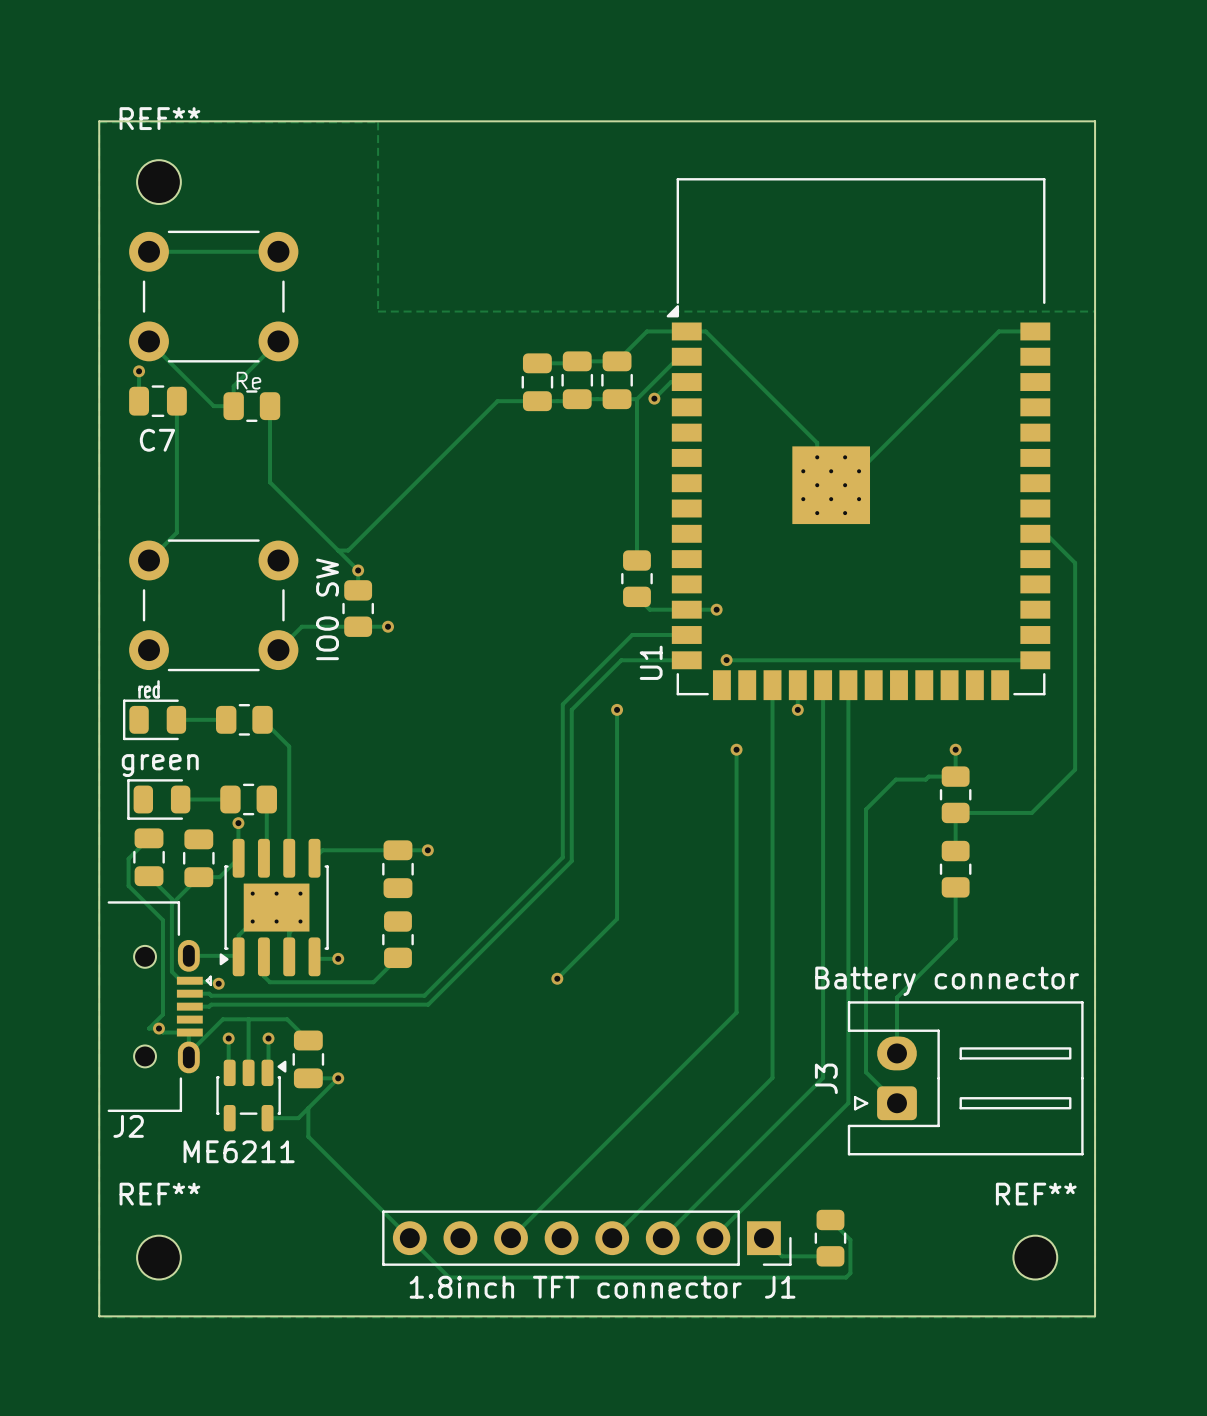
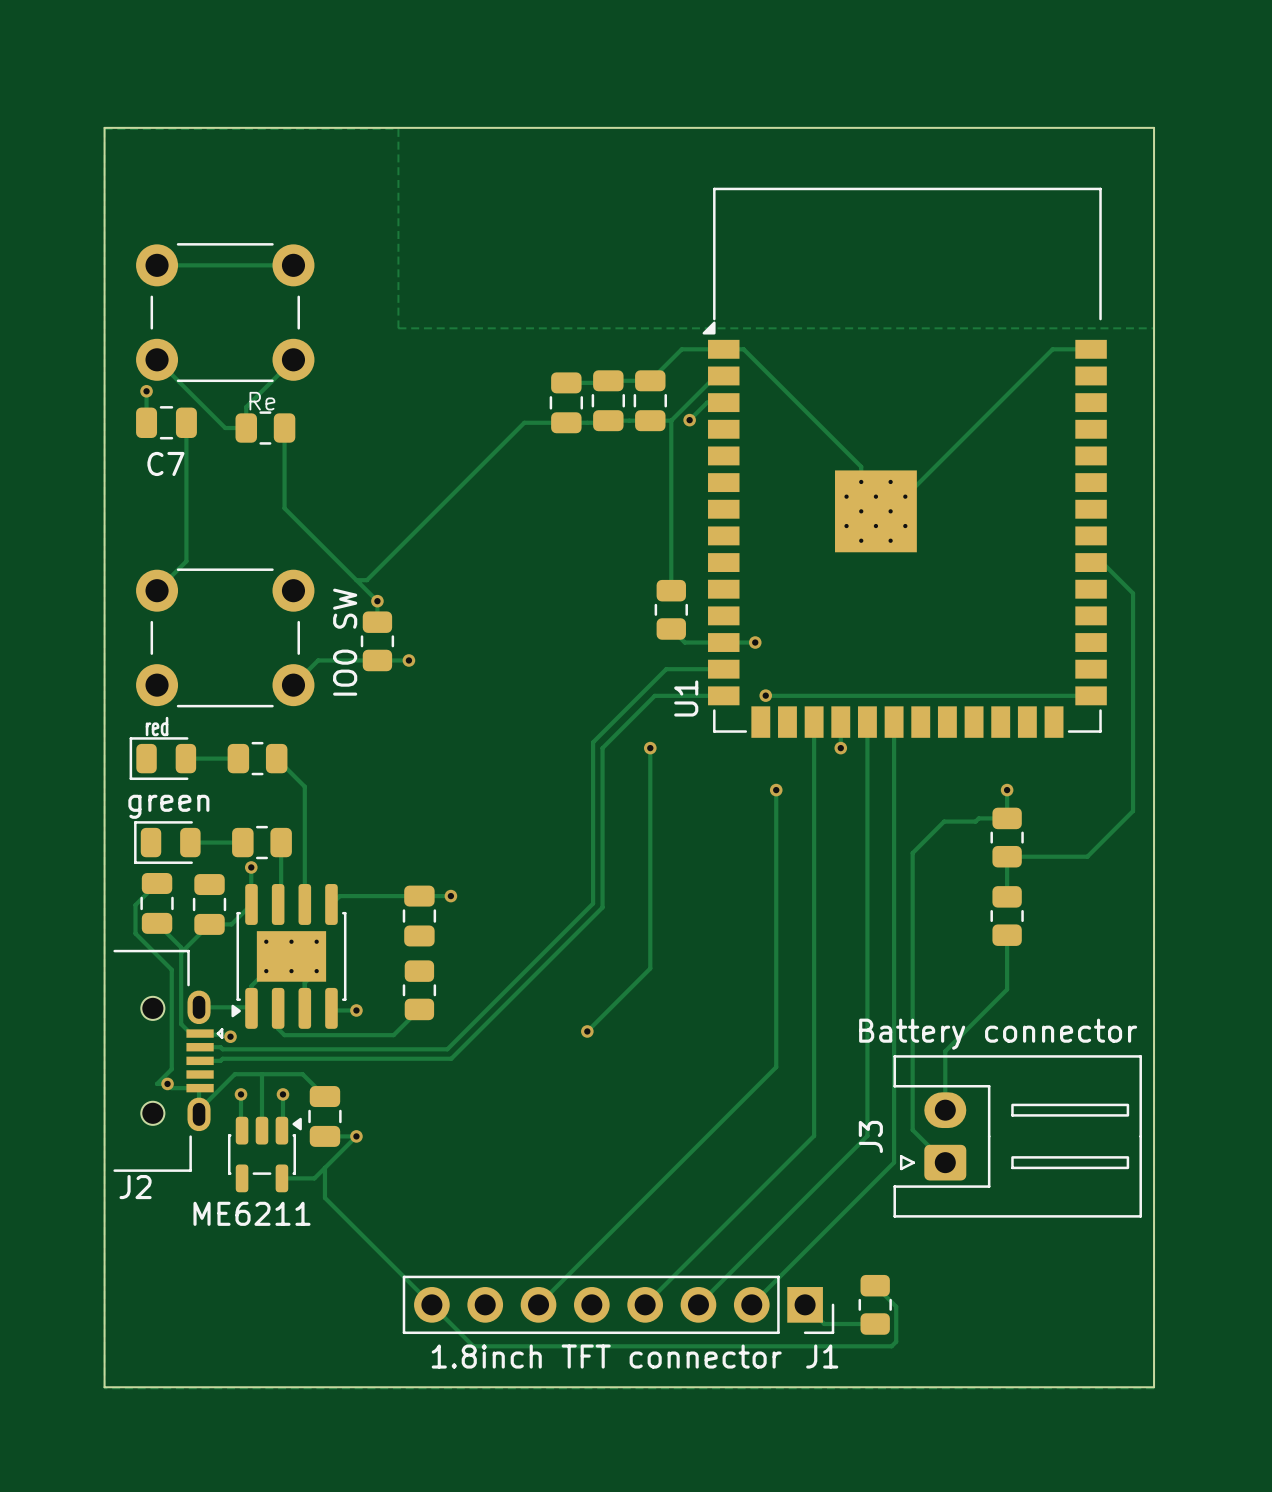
REF**: (158, 182) -> none
REF**: (158, 1257) -> none
REF**: (1035, 1257) -> none

